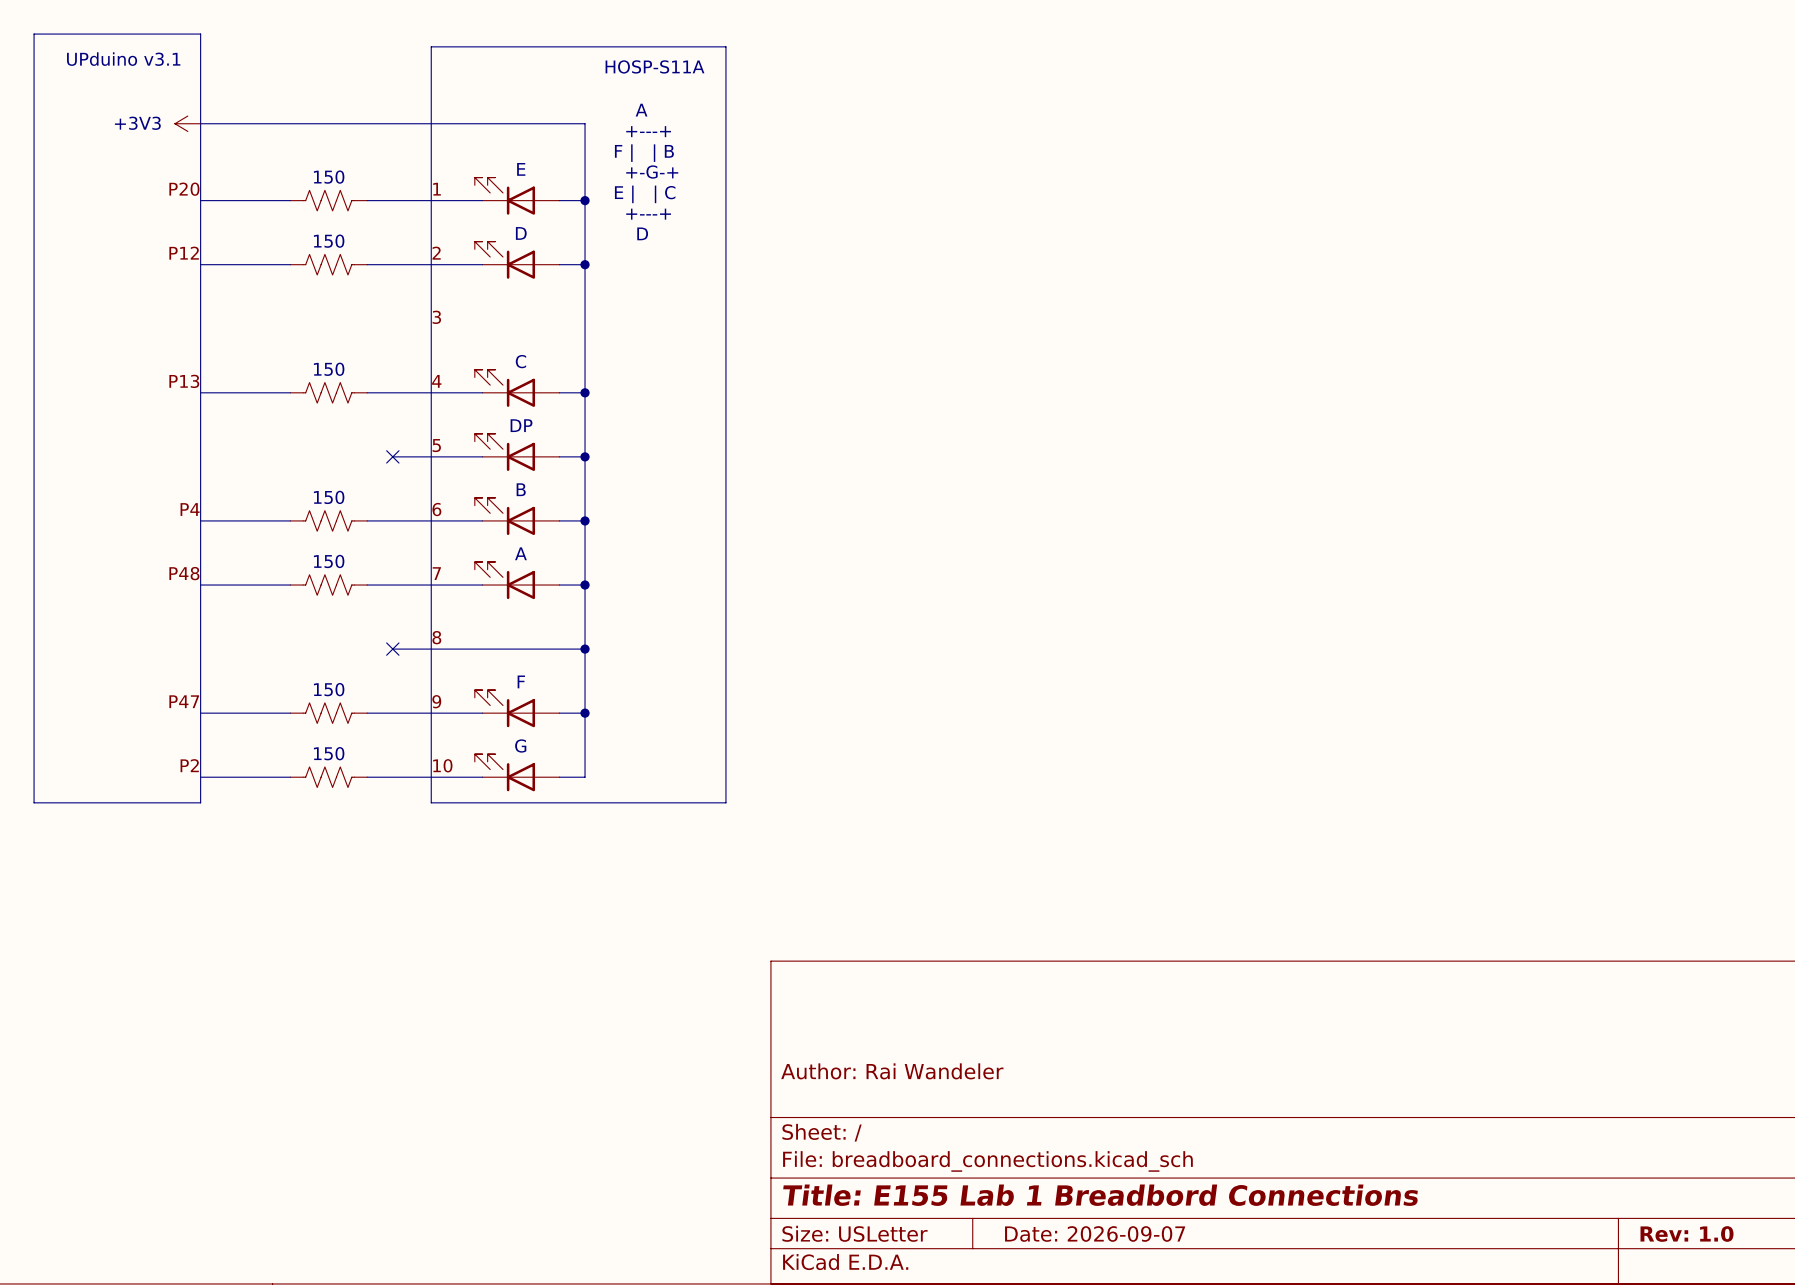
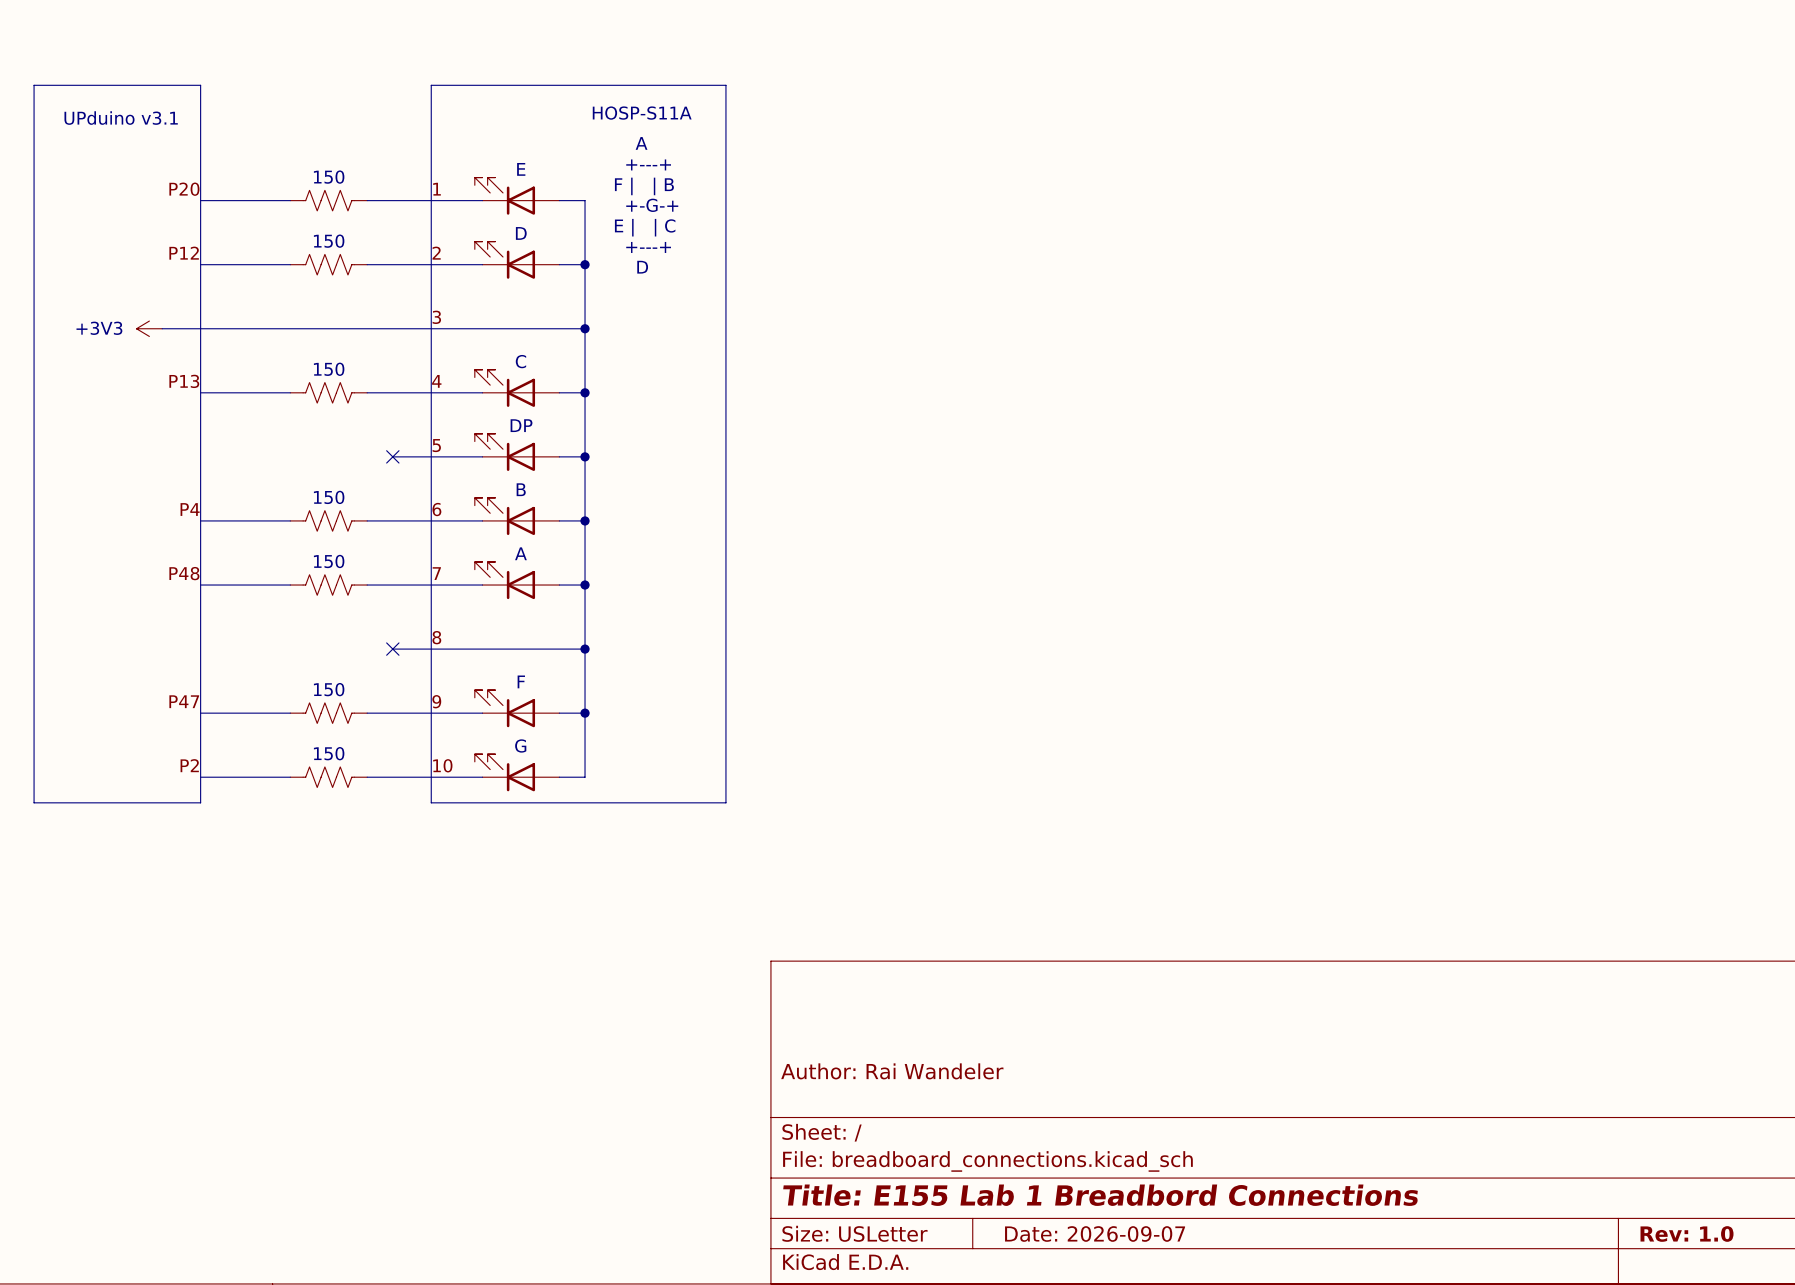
text position: UPduino v3.1 (123, 59) -> UPduino v3.1 (121, 118)
text position: HOSP-S11A (654, 66) -> HOSP-S11A (642, 113)
line: (34, 85) (34, 34) (200, 34) (200, 85) -> (34, 85) (200, 85)
line: (431, 85) (431, 46) (725, 46) (725, 85) -> (431, 85) (725, 85)
text position: A (641, 110) -> A (641, 143)
power symbol position: +3V3 (187, 123) -> +3V3 (149, 328)
wire: (200, 123) (585, 123) (585, 200) -> none
text: +---+ (648, 131) -> none
text position: F | | B (644, 153) -> F | | B (644, 186)
text: none -> +---+ (648, 164)
text position: +-G-+ (652, 172) -> +-G-+ (652, 205)
text position: E | | C (645, 194) -> E | | C (645, 227)
junction: (585, 200) -> none
text: +---+ (648, 214) -> none
text position: D (642, 233) -> D (642, 267)
text: none -> +---+ (648, 247)
wire: none -> (162, 328) (585, 328)
junction: none -> (585, 328)

